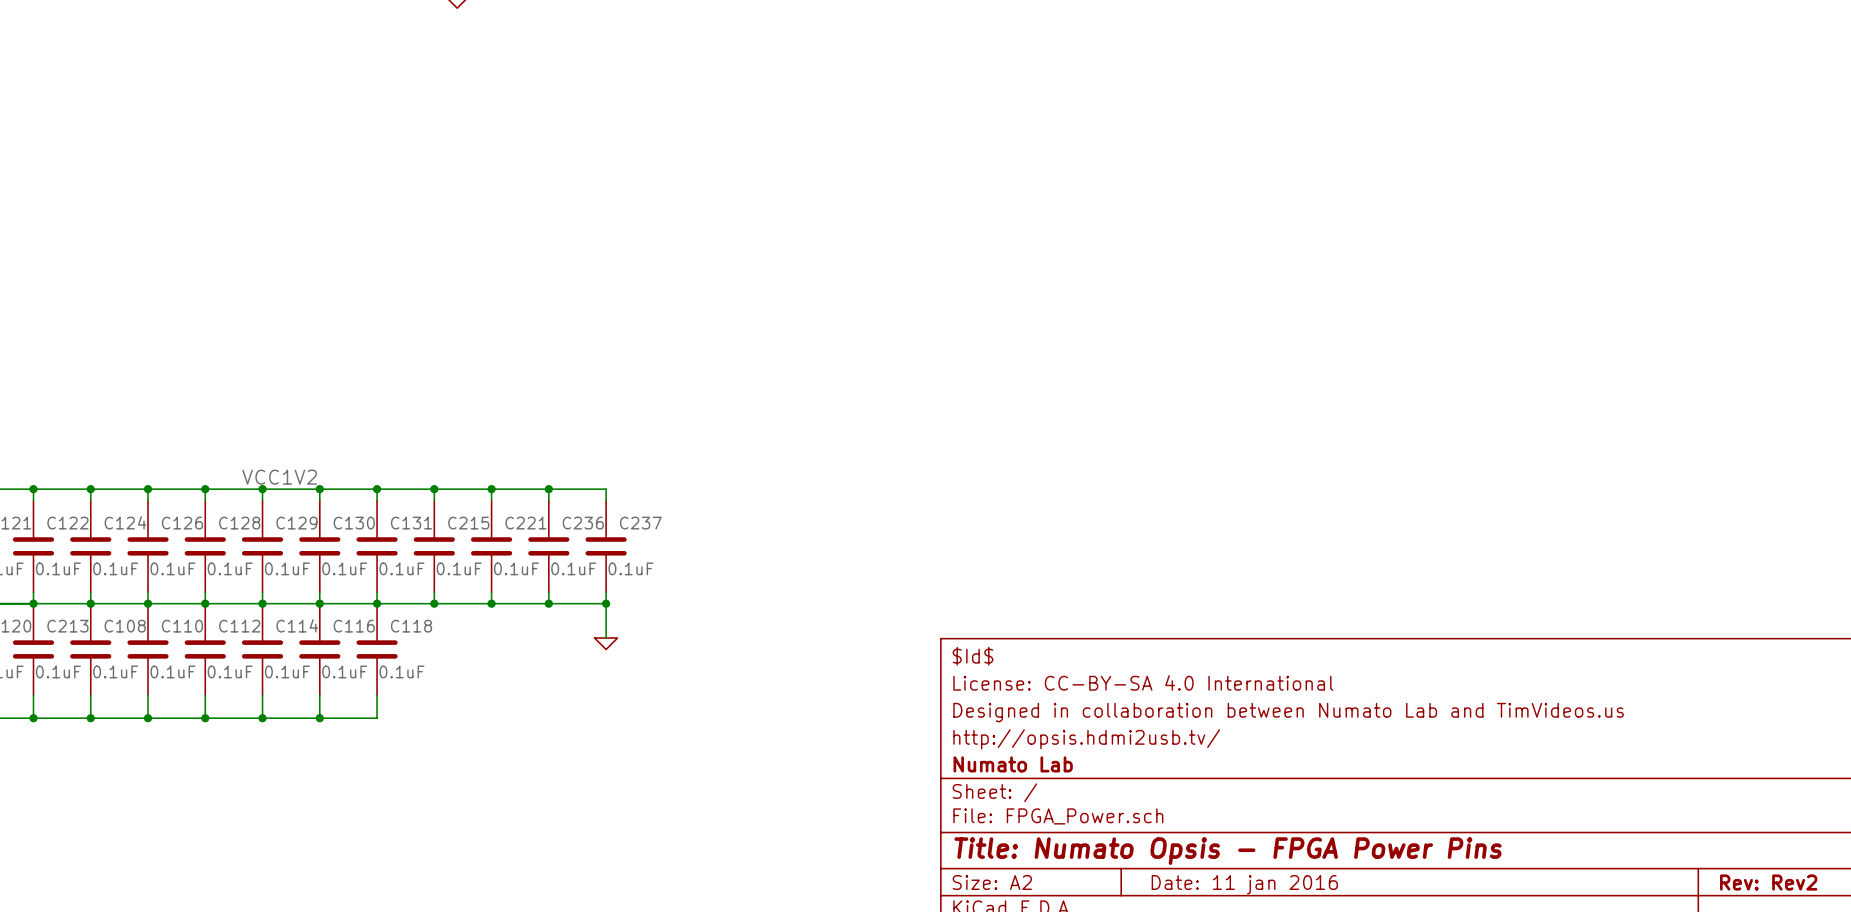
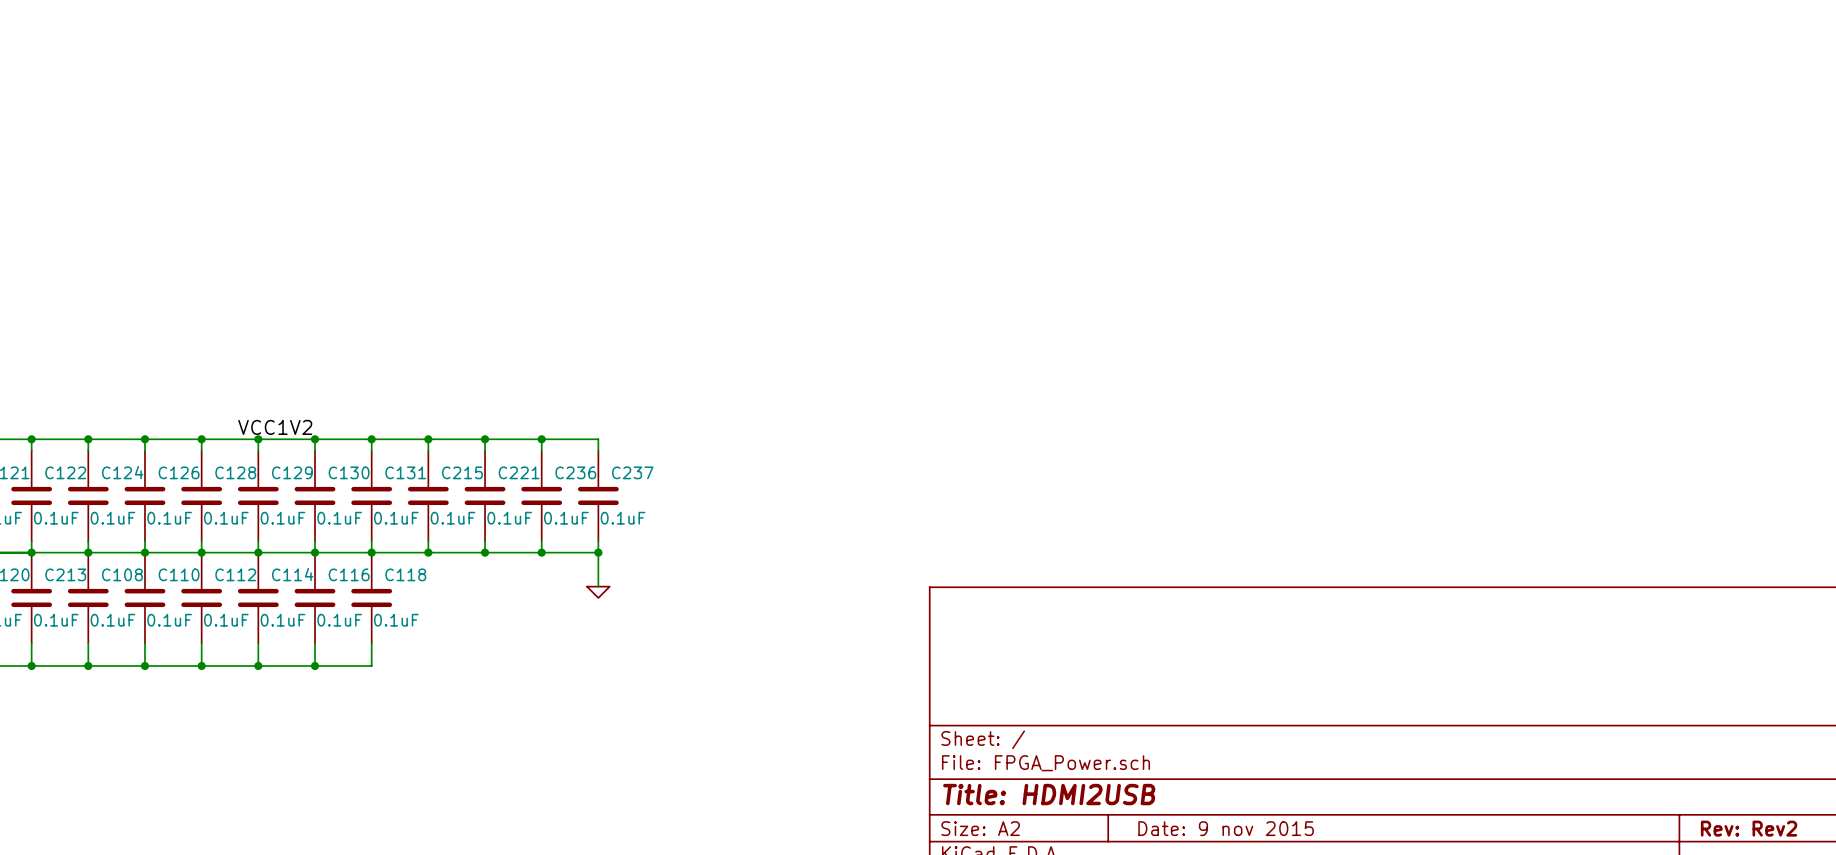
title block: $Id$ (973, 656) -> none
title block: License: CC-BY-SA 4.0 International (1143, 682) -> none
title block: Designed in collaboration between Numato Lab and TimVideos.us (1288, 712) -> none
title block: http://opsis.hdmi2usb.tv/ (1086, 739) -> none
title block: Numato Lab (1013, 764) -> none
title block: Title: Numato Opsis - FPGA Power Pins (1228, 851) -> Title: HDMI2USB (1049, 794)
title block: Date: 11 jan 2016 (1244, 884) -> Date: 9 nov 2015 (1226, 828)

